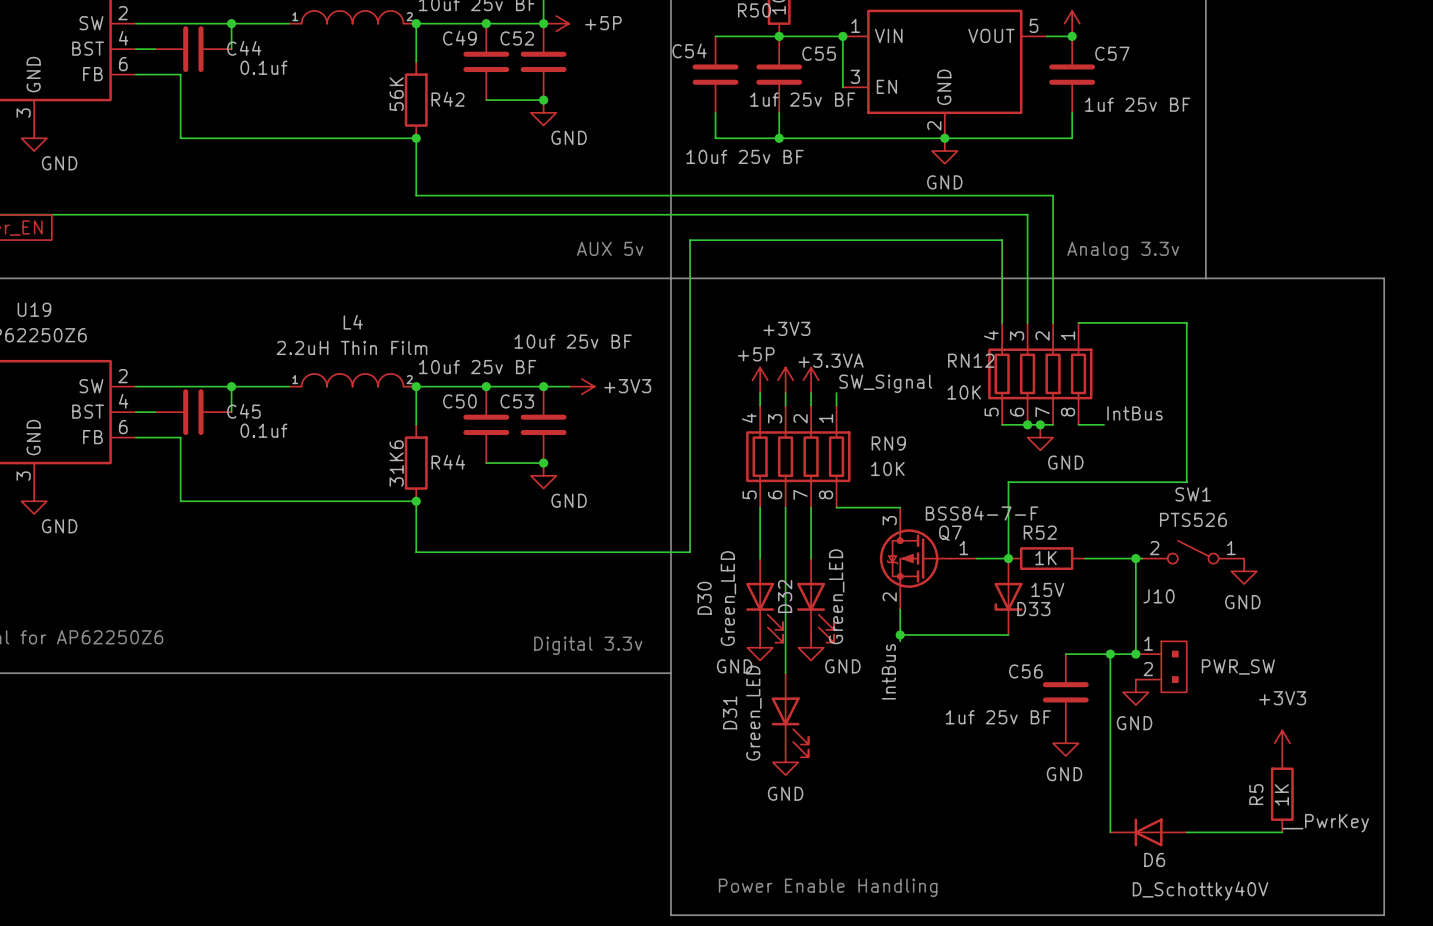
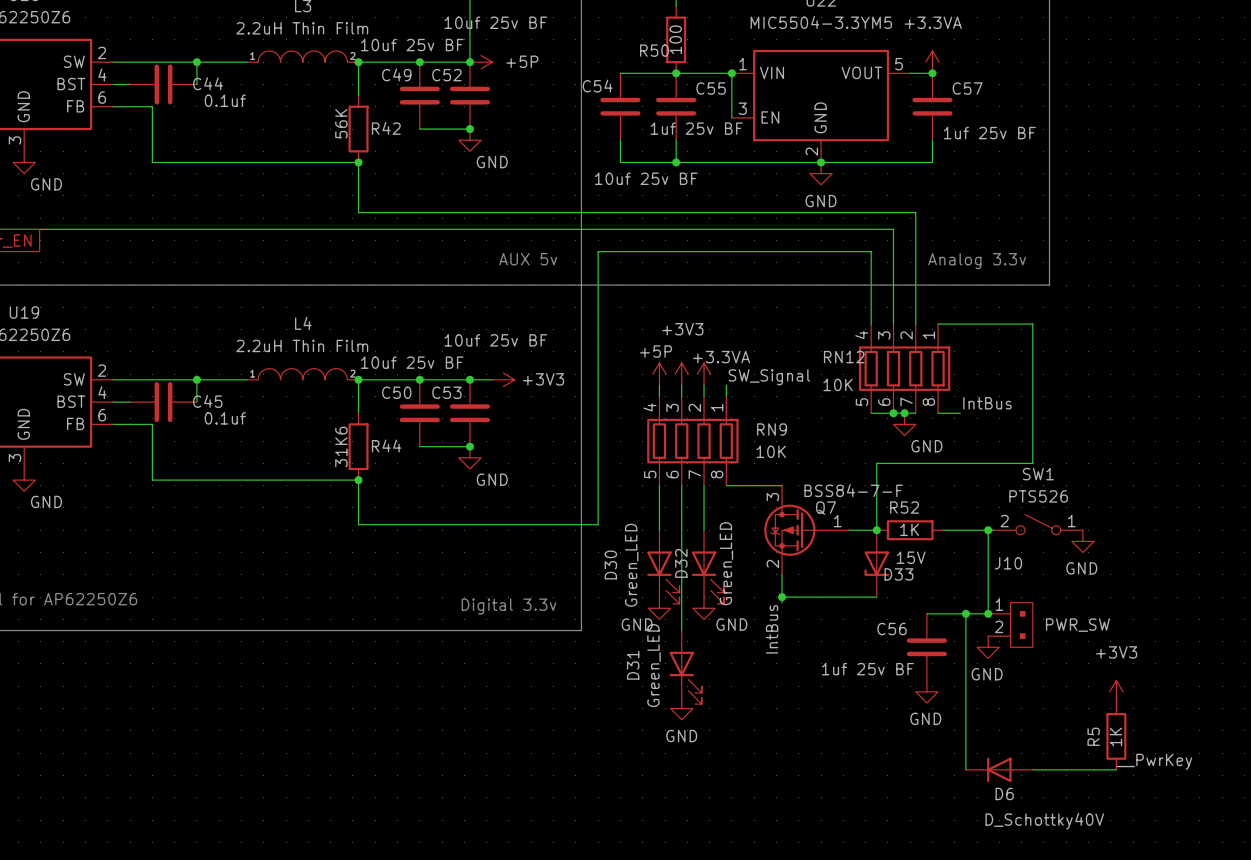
line: (1205, 278) (1384, 278) (1384, 915) (670, 915) (670, 673) -> none
text: Power Enable Handling (828, 887) -> none

